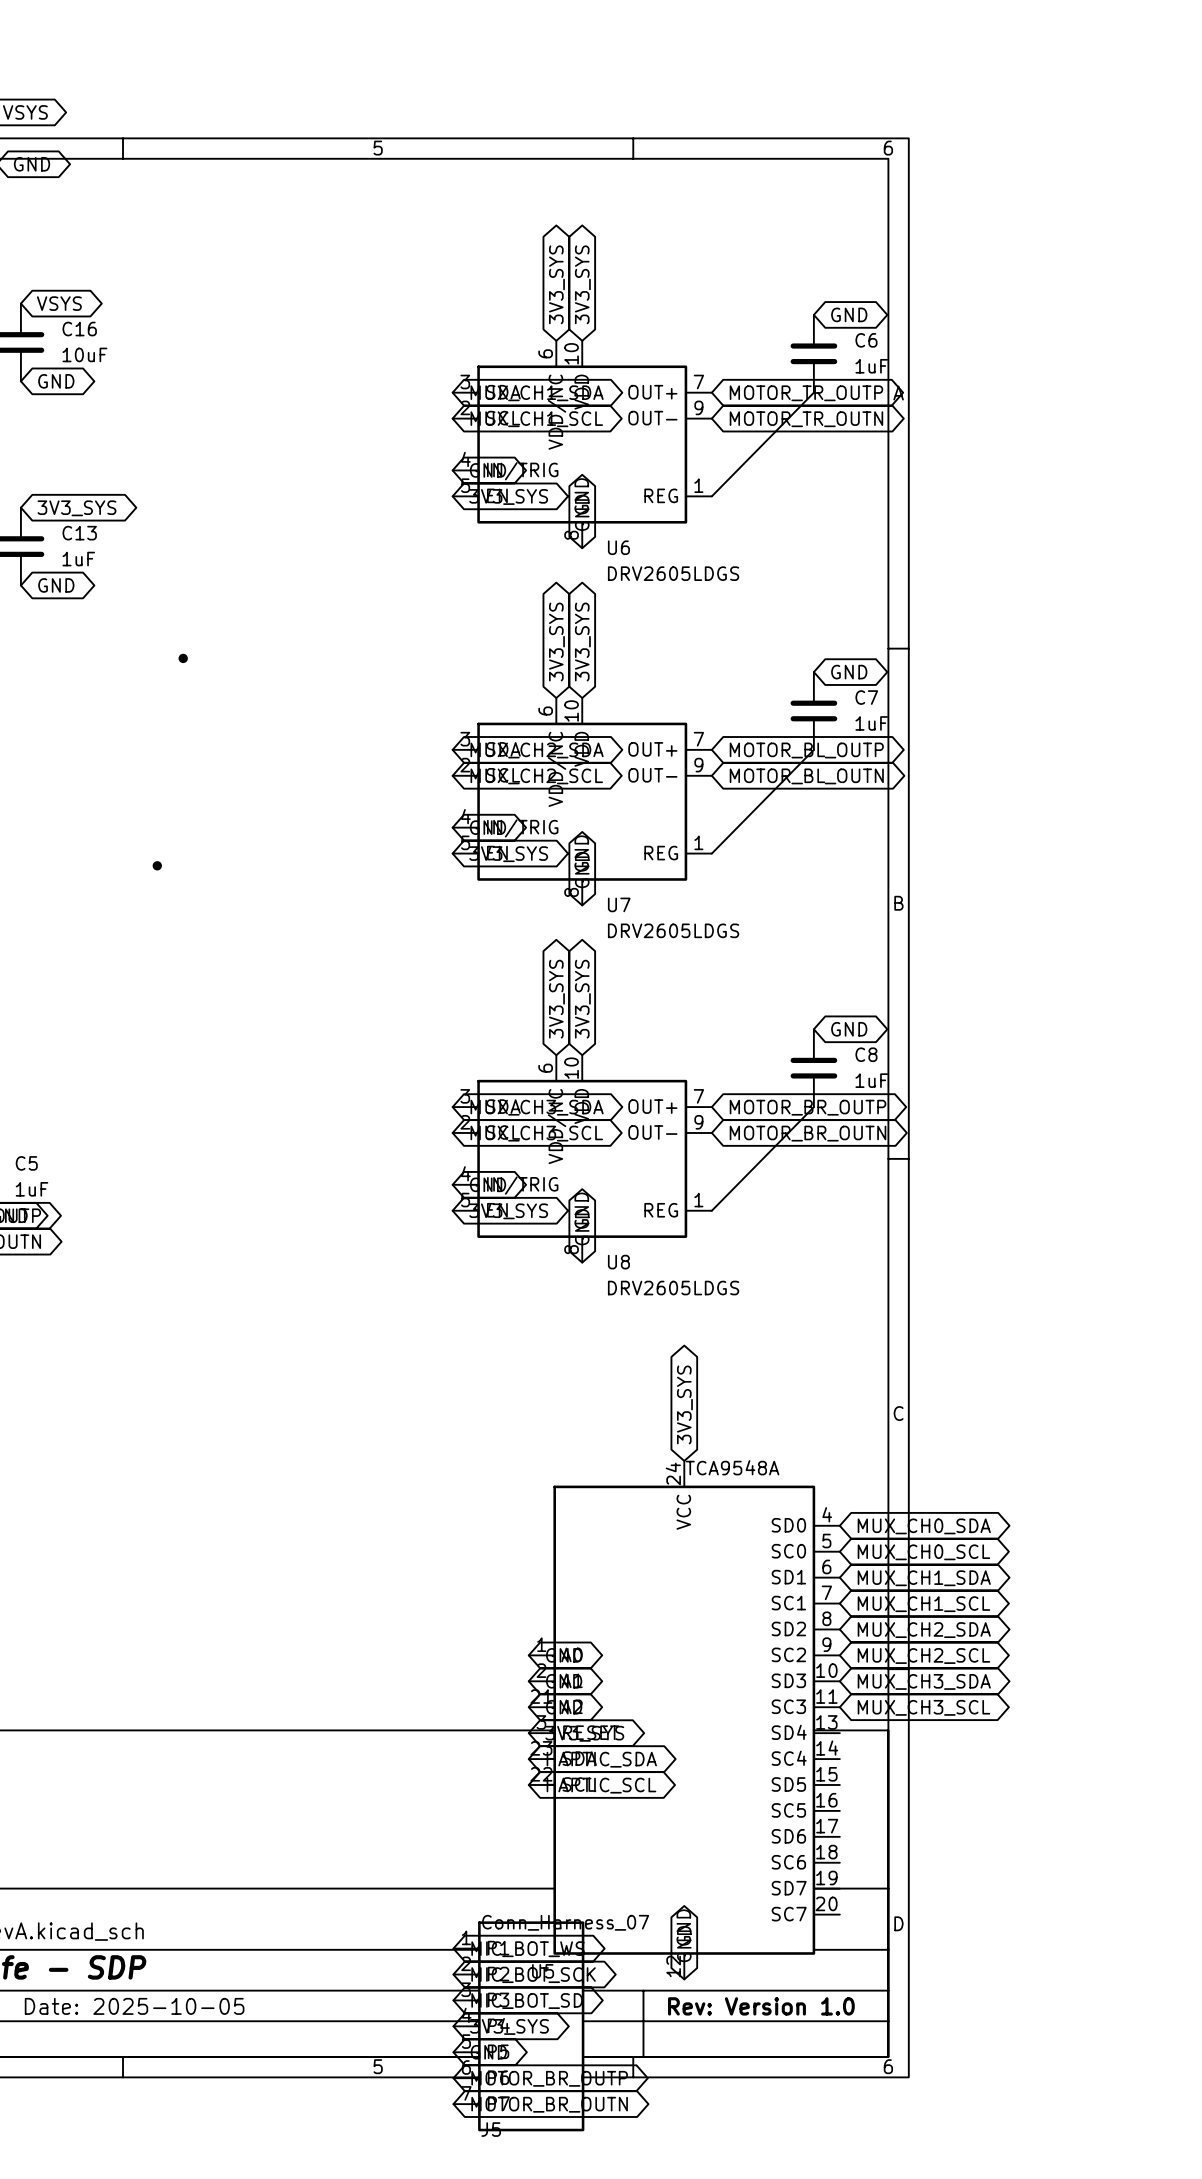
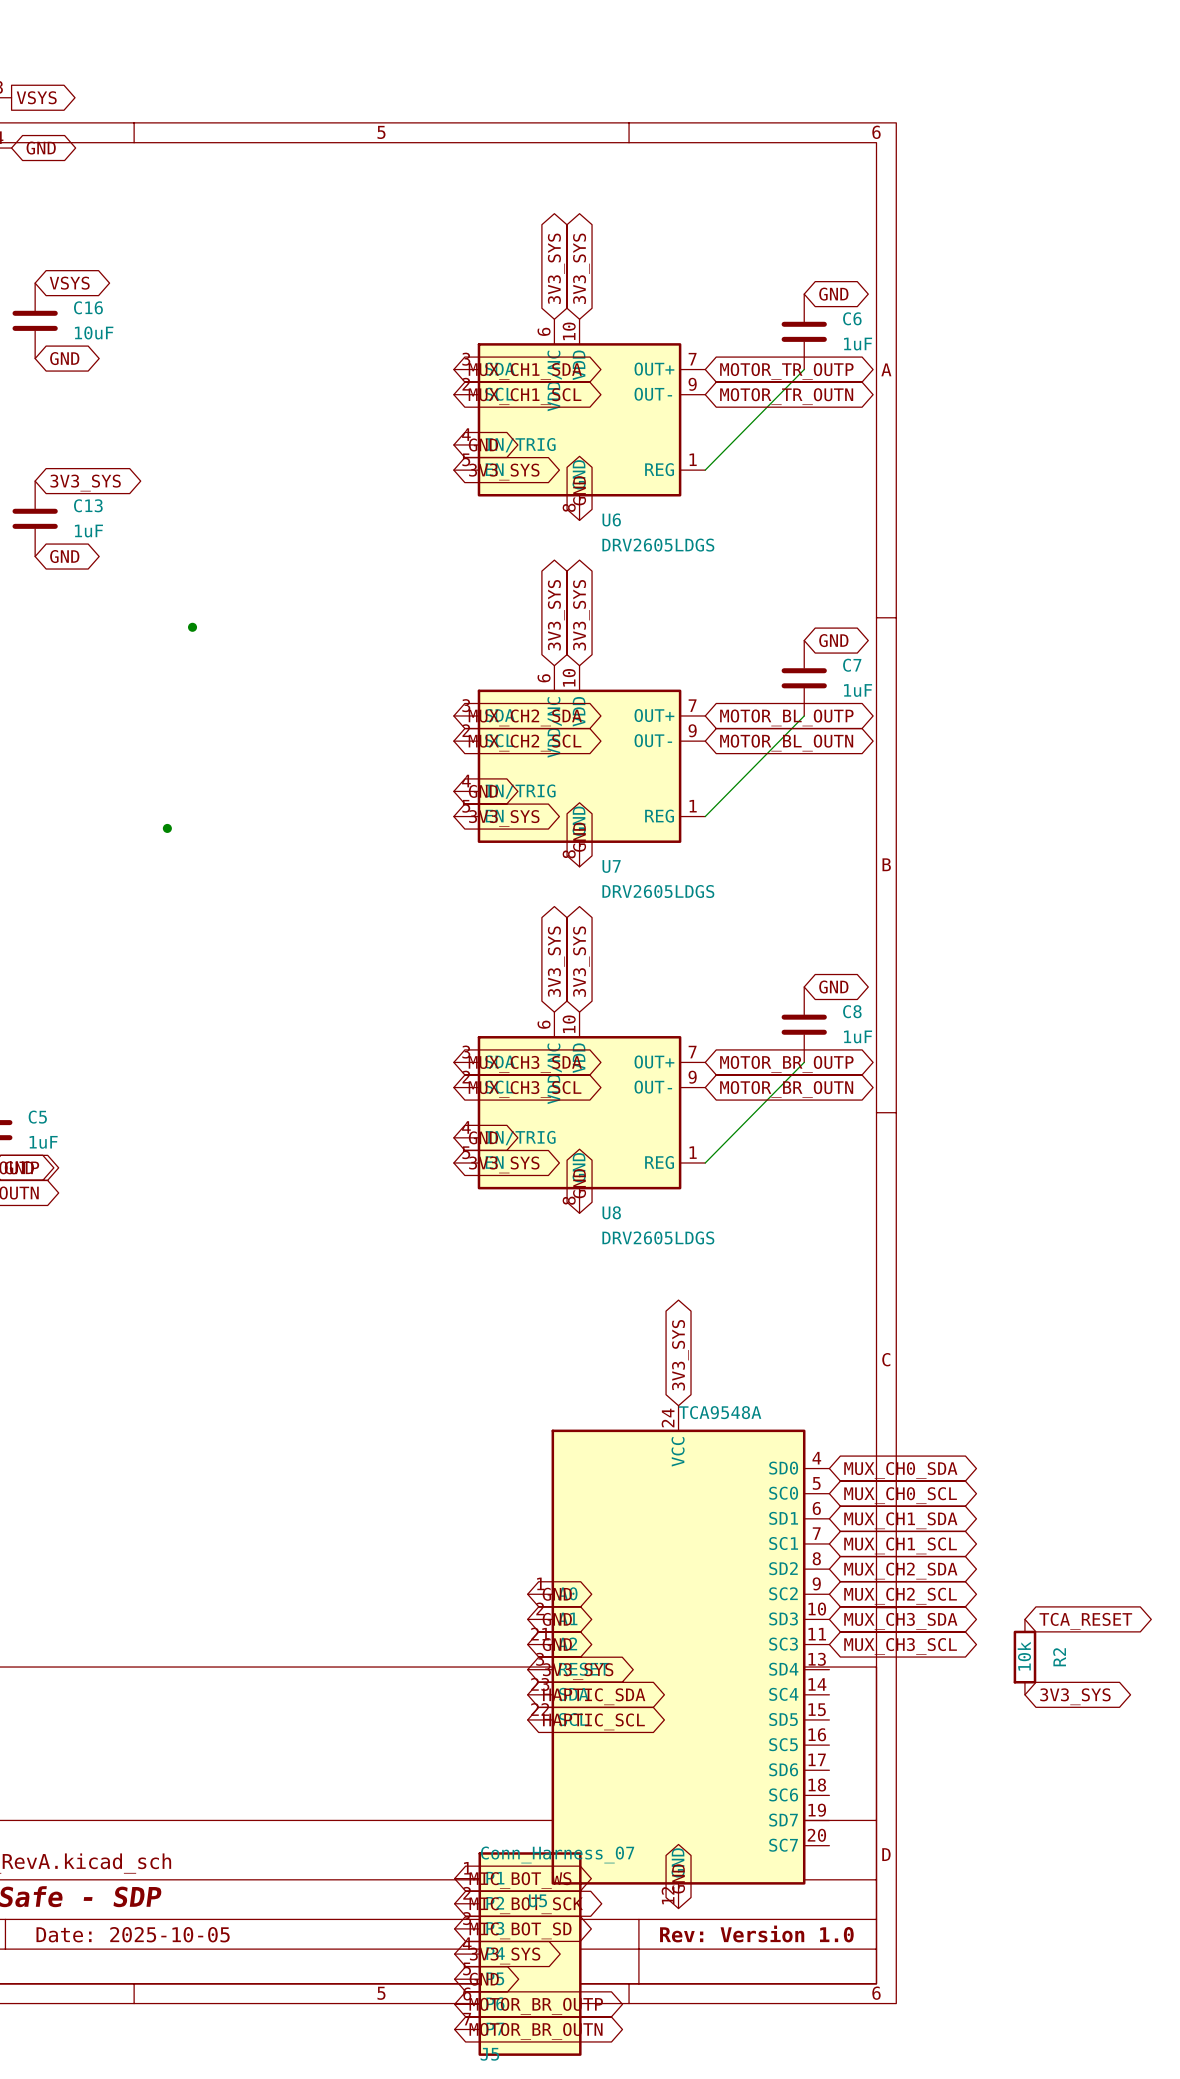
global label: none -> TCA_RESET (1085, 1621)
R2: none -> 10k (1024, 1657)
global label: none -> 3V3_SYS (1075, 1696)

